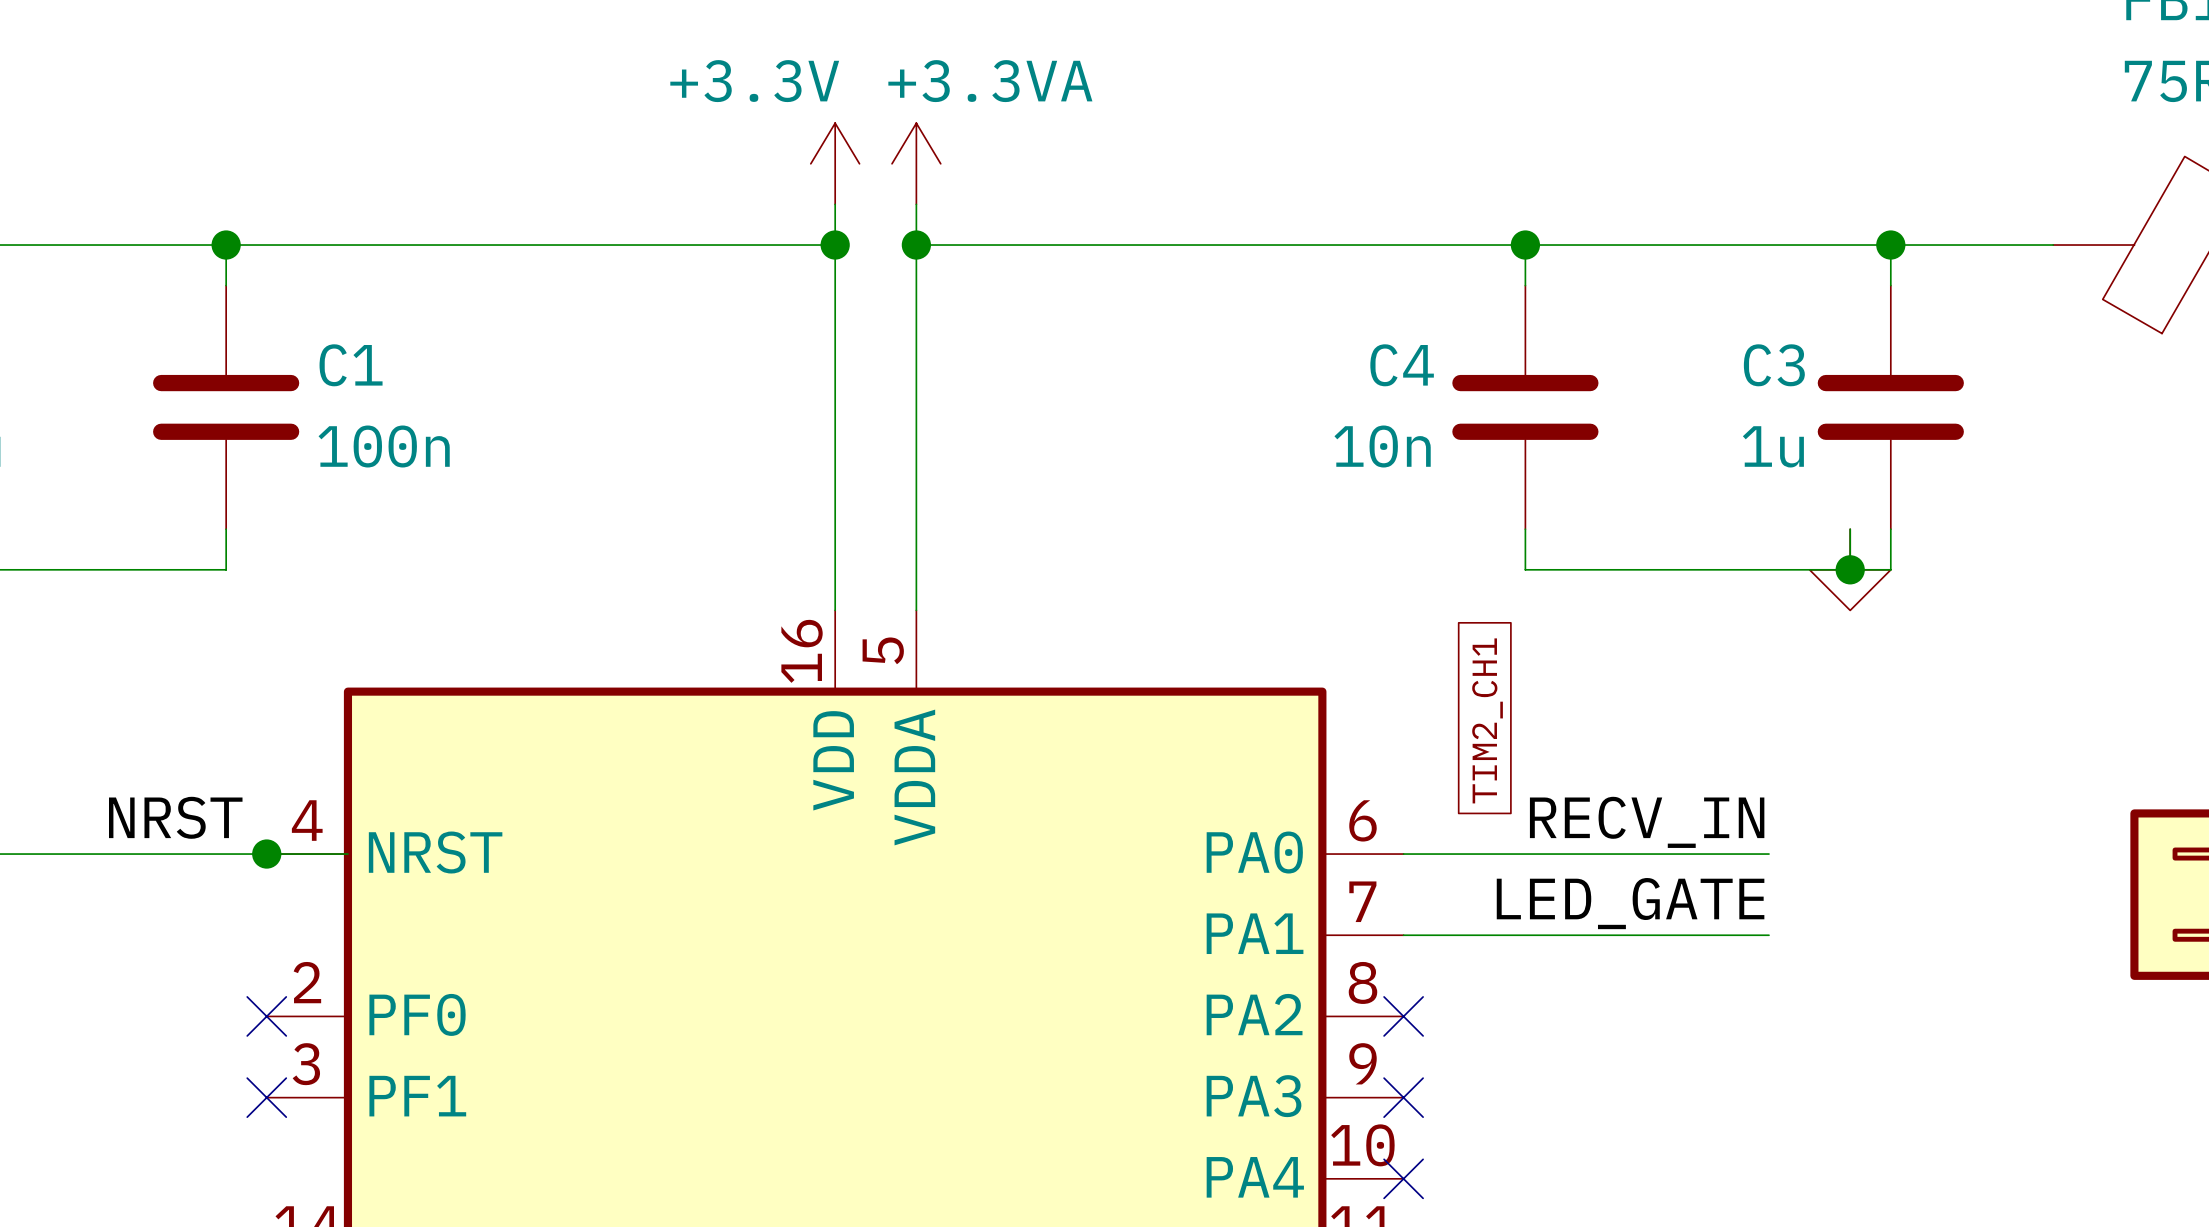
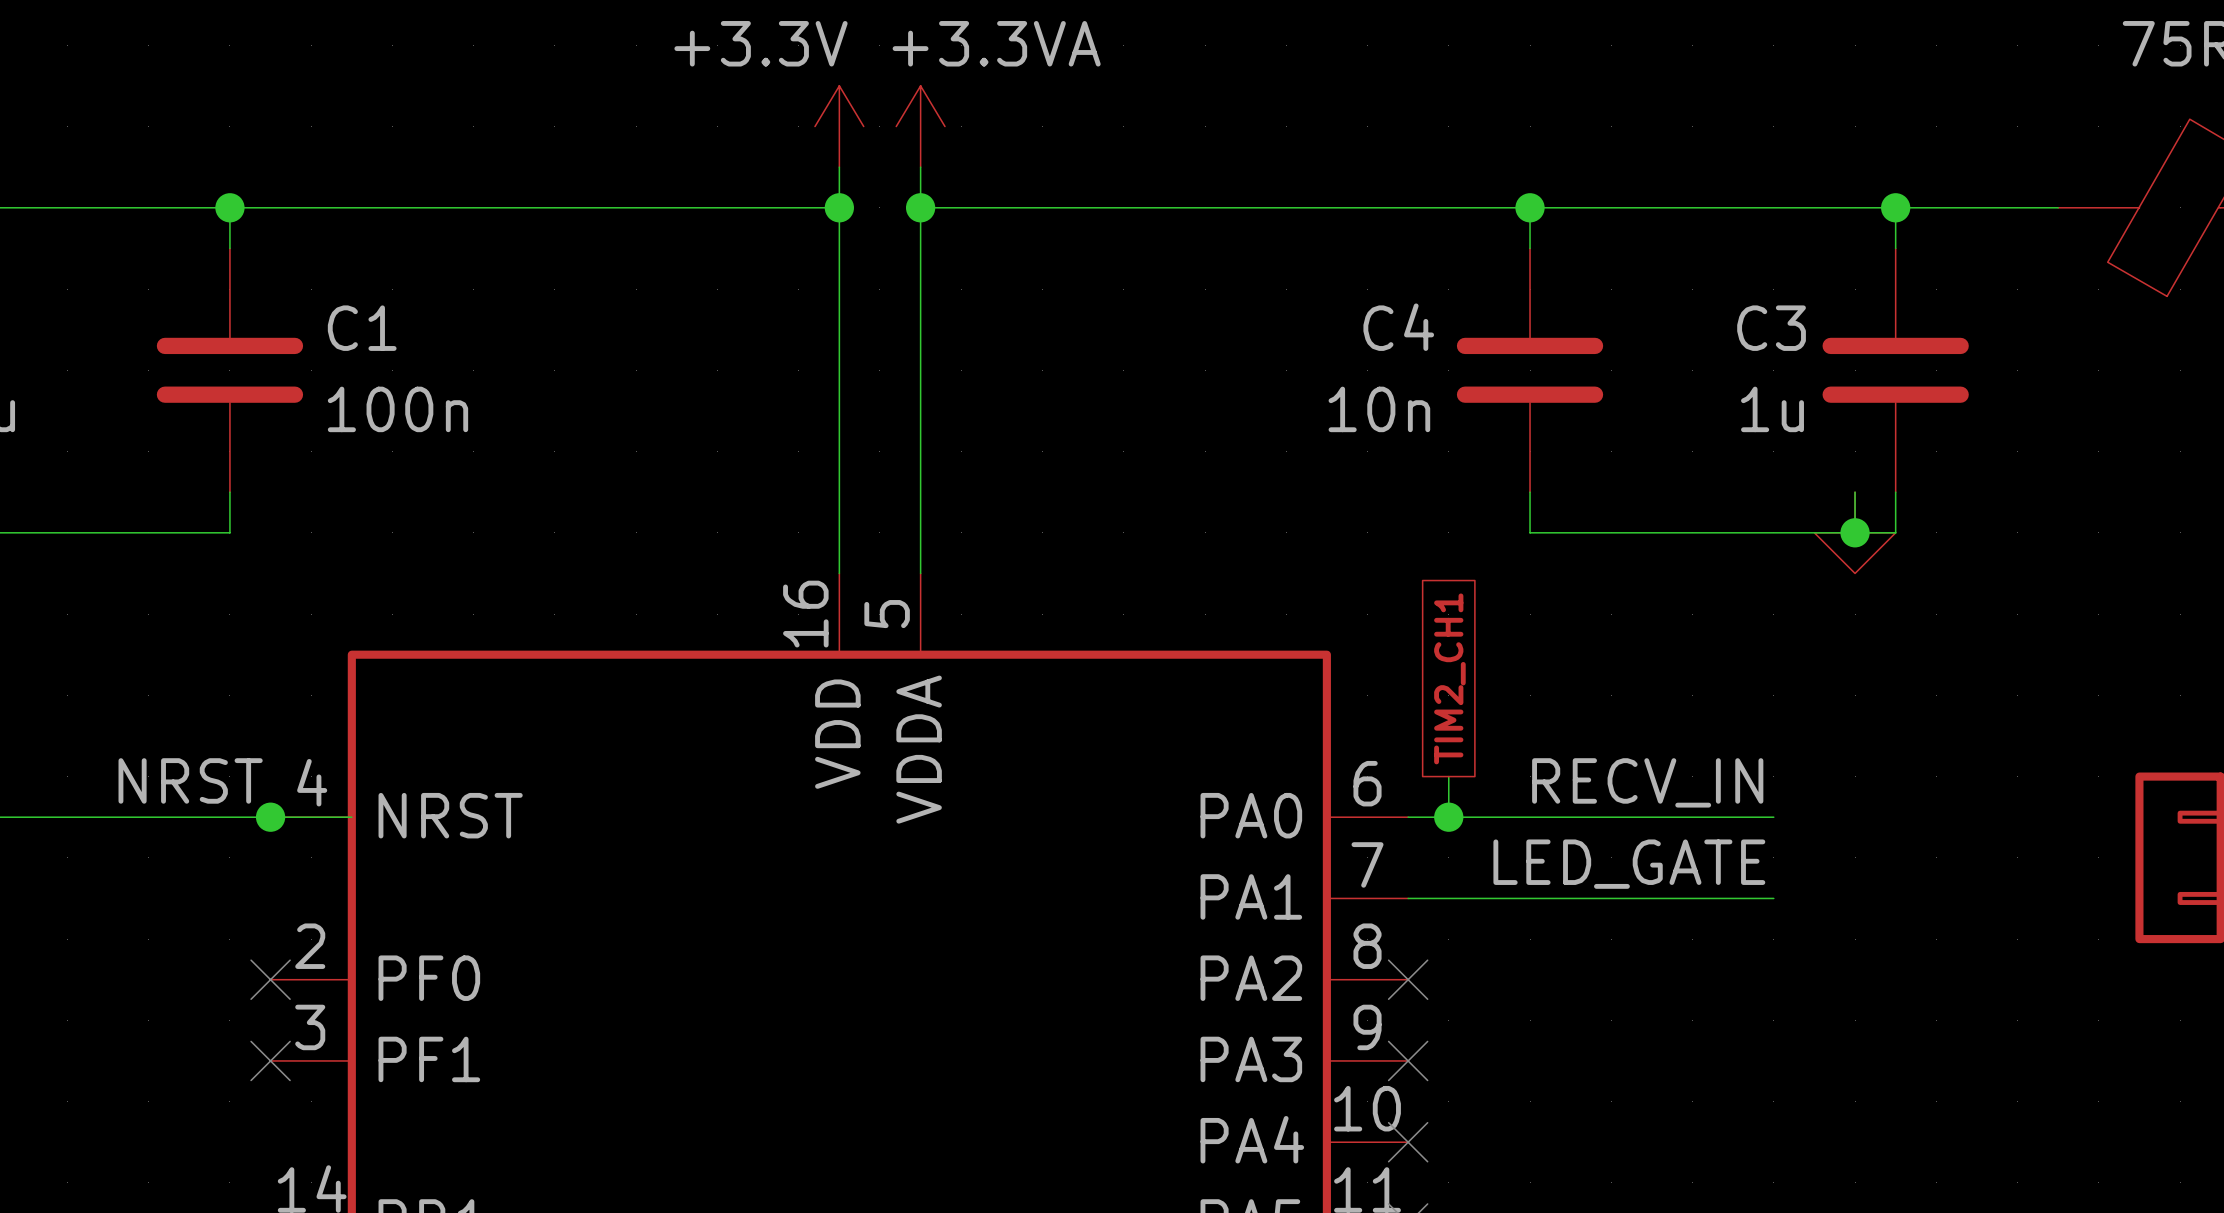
global label position: TIM2_CH1 (1487, 720) -> TIM2_CH1 (1449, 678)
wire: none -> (1448, 776) (1448, 817)
junction: none -> (1448, 817)

